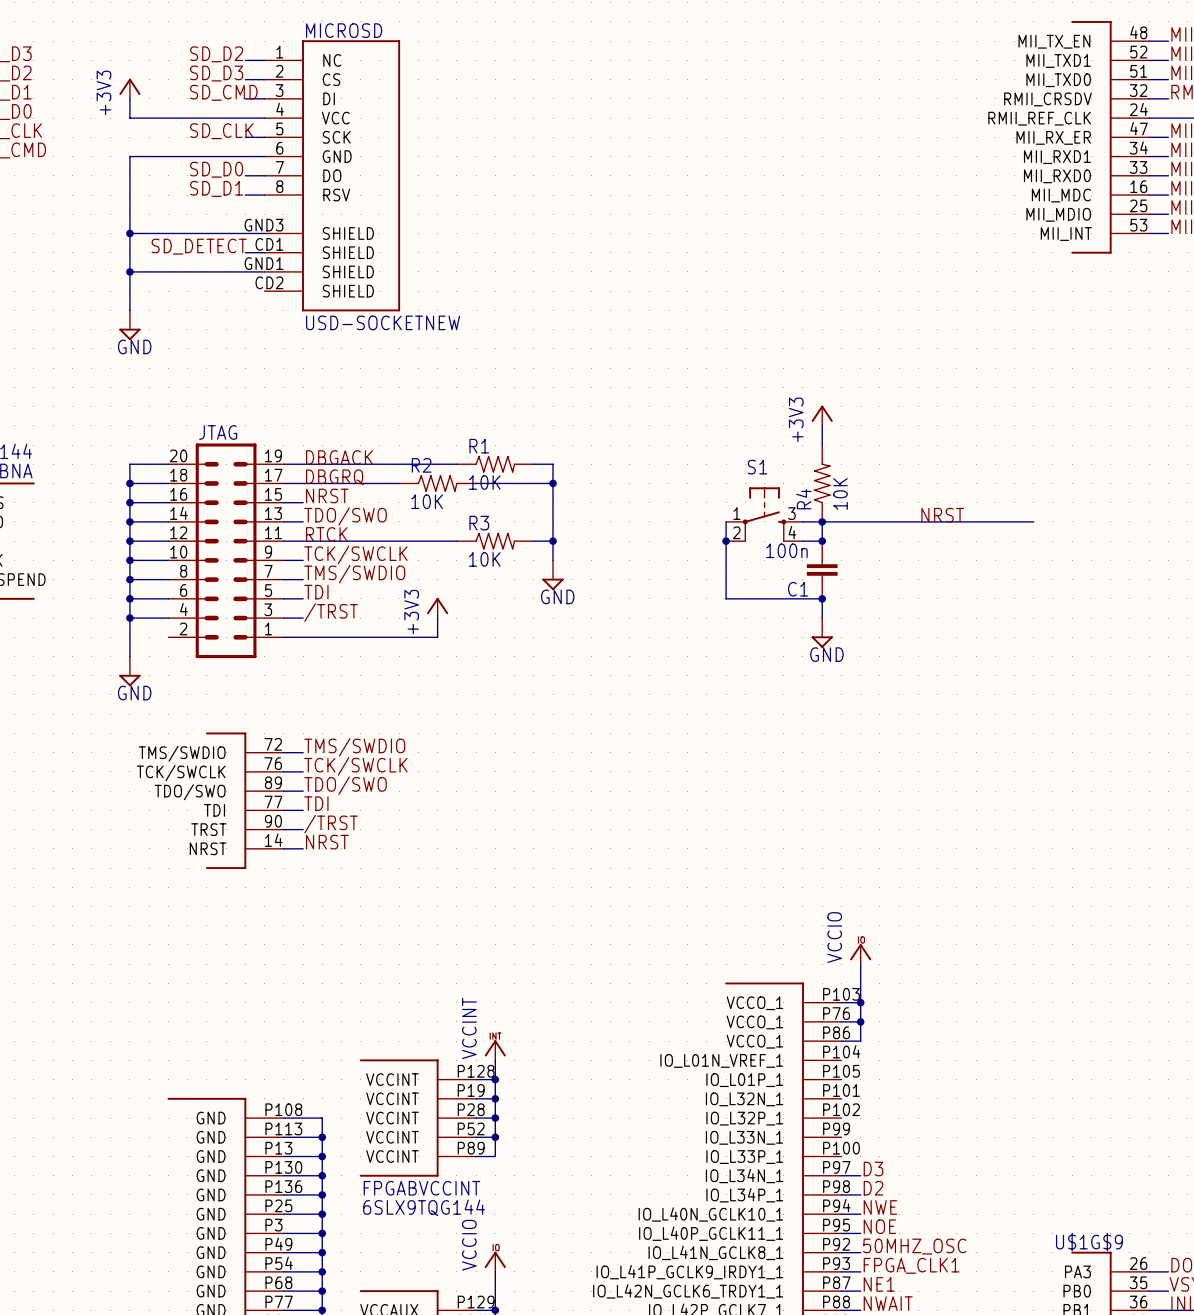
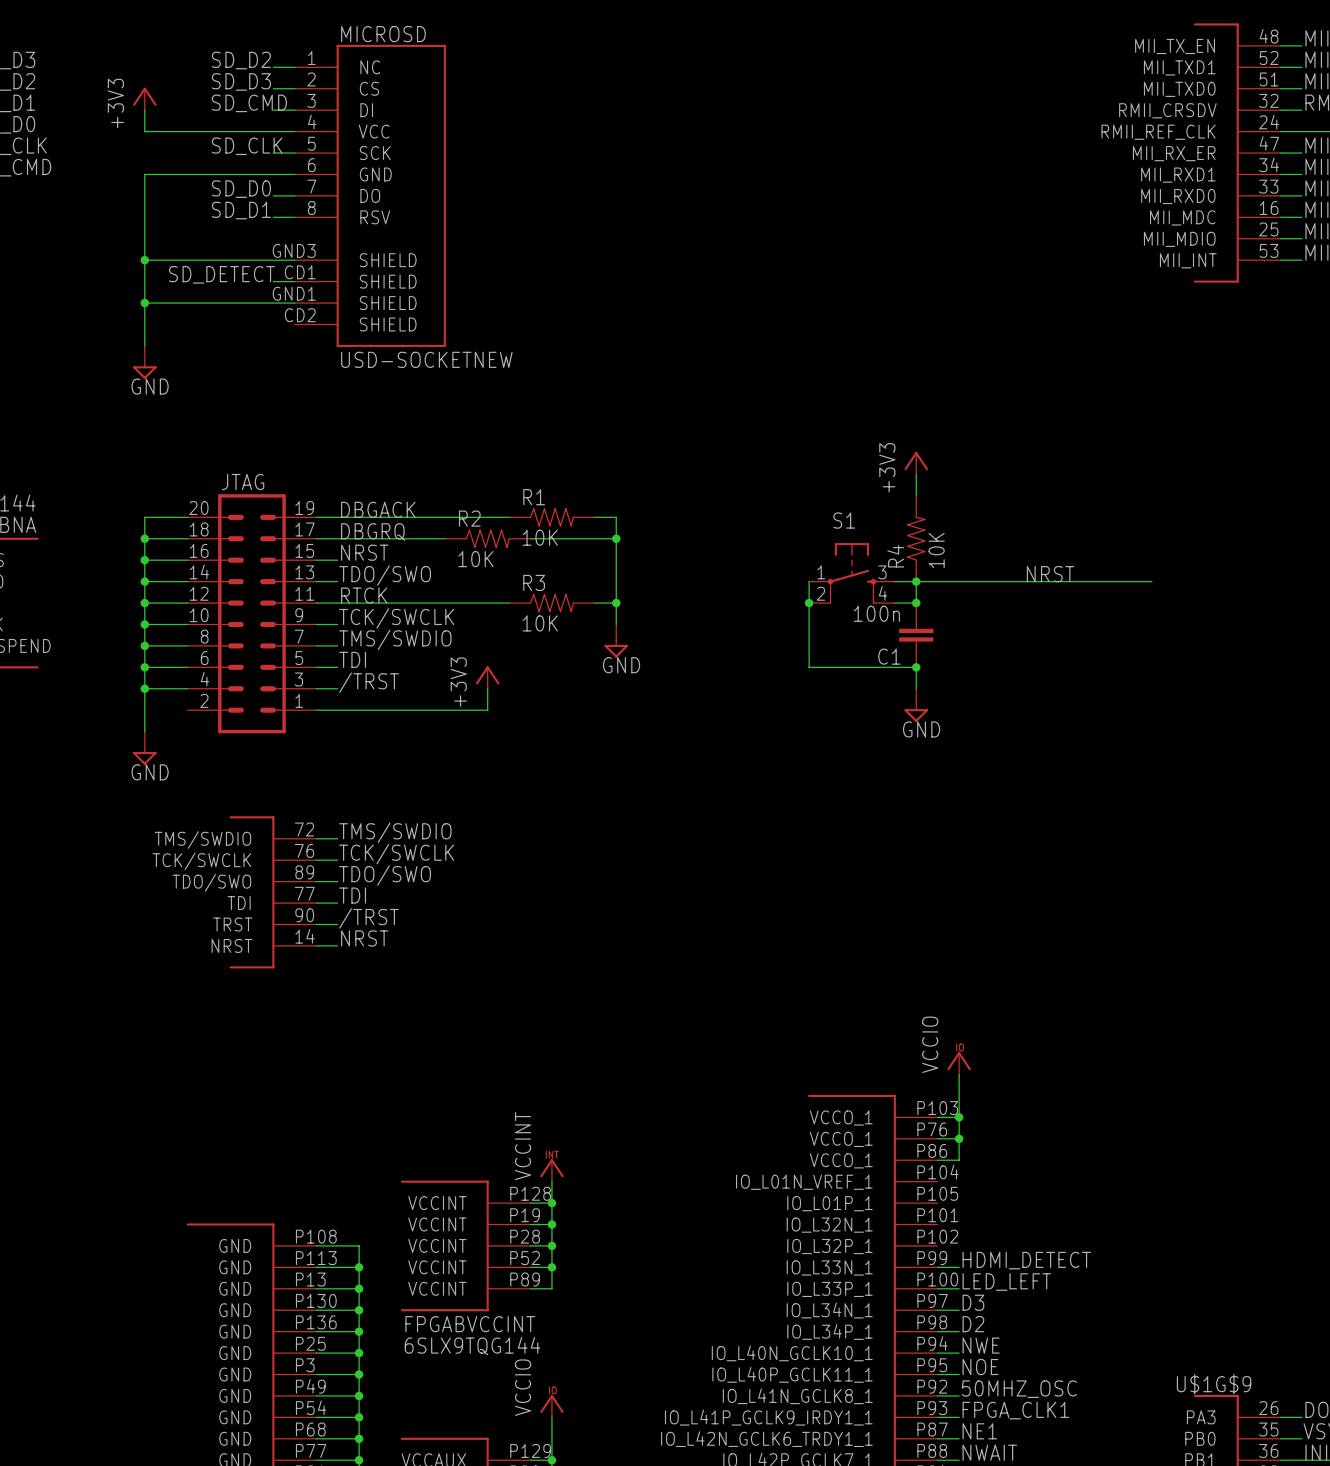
label: none -> HDMI_DETECT (1026, 1260)
wire: none -> (937, 1267) (959, 1267)
label: none -> LED_LEFT (1006, 1282)
wire: none -> (937, 1288) (959, 1288)

